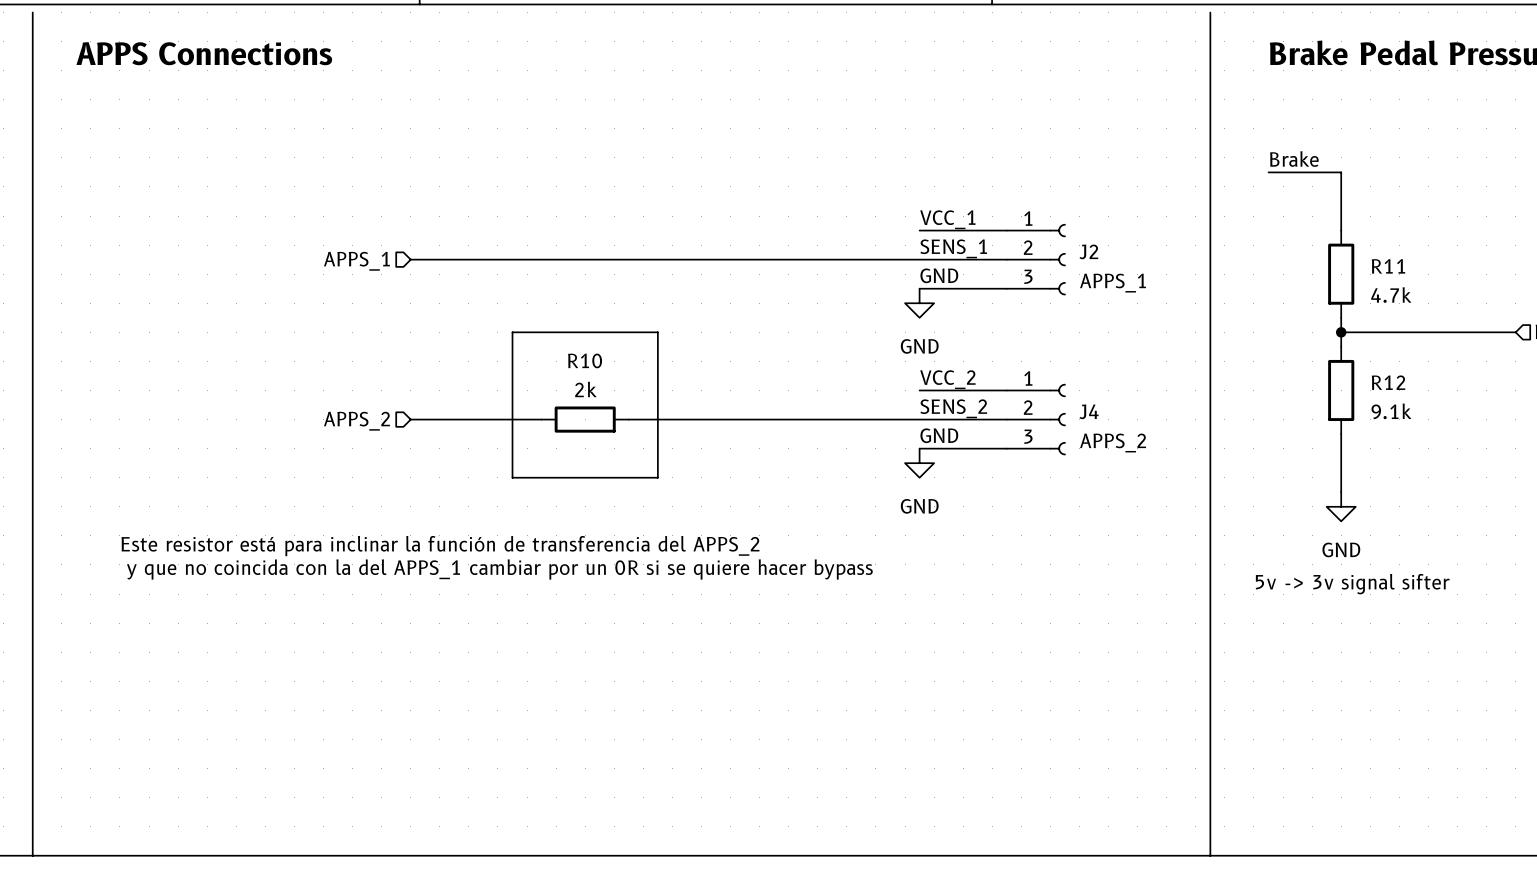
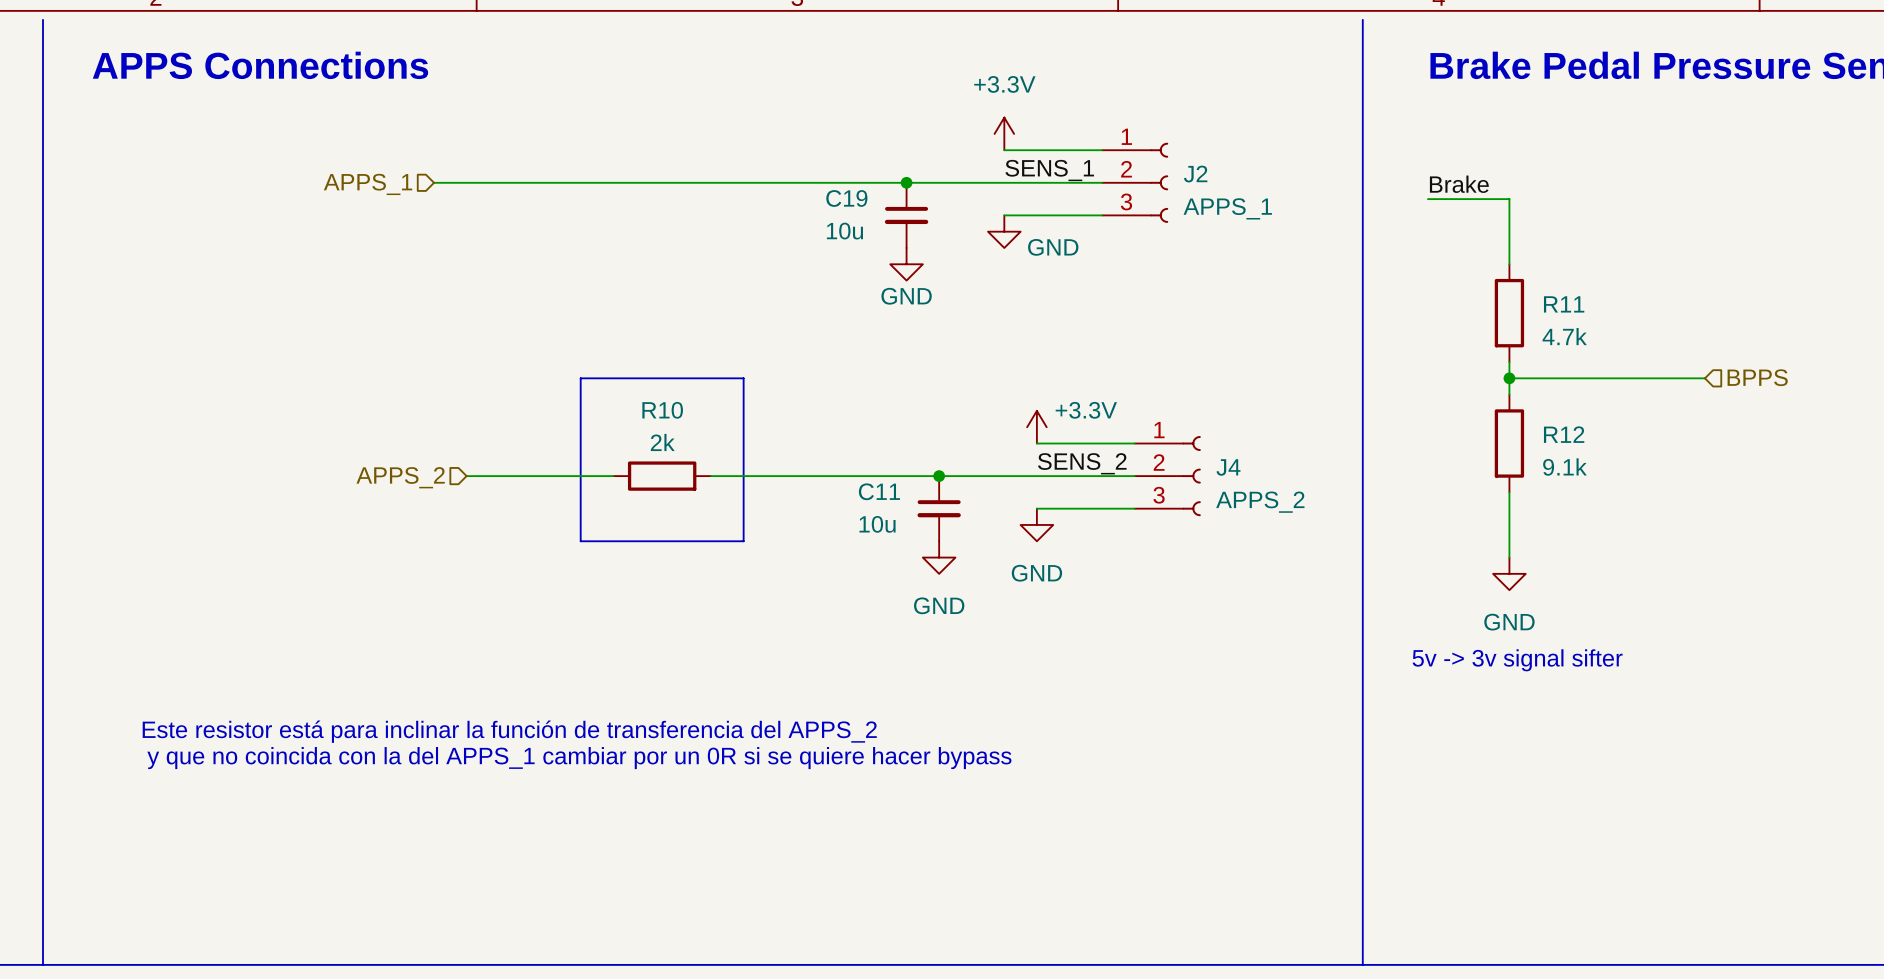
power symbol: none -> +3.3V (1004, 133)
junction: none -> (906, 182)
C19: none -> 10u (906, 215)
power symbol: none -> GND (1004, 231)
label: VCC_1 (947, 219) -> none
power symbol: none -> GND (906, 264)
wire: (919, 230) (1006, 230) -> (1004, 150) (1102, 150)
label position: SENS_1 (953, 248) -> SENS_1 (1049, 170)
wire: (410, 259) (1006, 259) -> (434, 182) (1102, 182)
J2 position: (1036, 259) -> (1135, 182)
hierarchical label position: APPS_1 (356, 261) -> APPS_1 (368, 184)
label: GND (939, 275) -> none
wire: (919, 288) (1006, 288) -> (1004, 215) (1102, 215)
power symbol: GND (919, 303) -> none
power symbol: none -> +3.3V (1036, 427)
label: VCC_2 (947, 379) -> none
junction: none -> (939, 476)
label: GND (939, 435) -> none
C11: none -> 10u (939, 508)
power symbol: none -> GND (939, 557)
text position: Este resistor está para inclinar la función de transferencia del APPS_2 (440, 546) -> Este resistor está para inclinar la función de transferencia del APPS_2 (509, 731)
text position: y que no coincida con la del APPS_1 cambiar por un 0R si se quiere hacer bypass (499, 569) -> y que no coincida con la del APPS_1 cambiar por un 0R si se quiere hacer bypass (579, 758)

